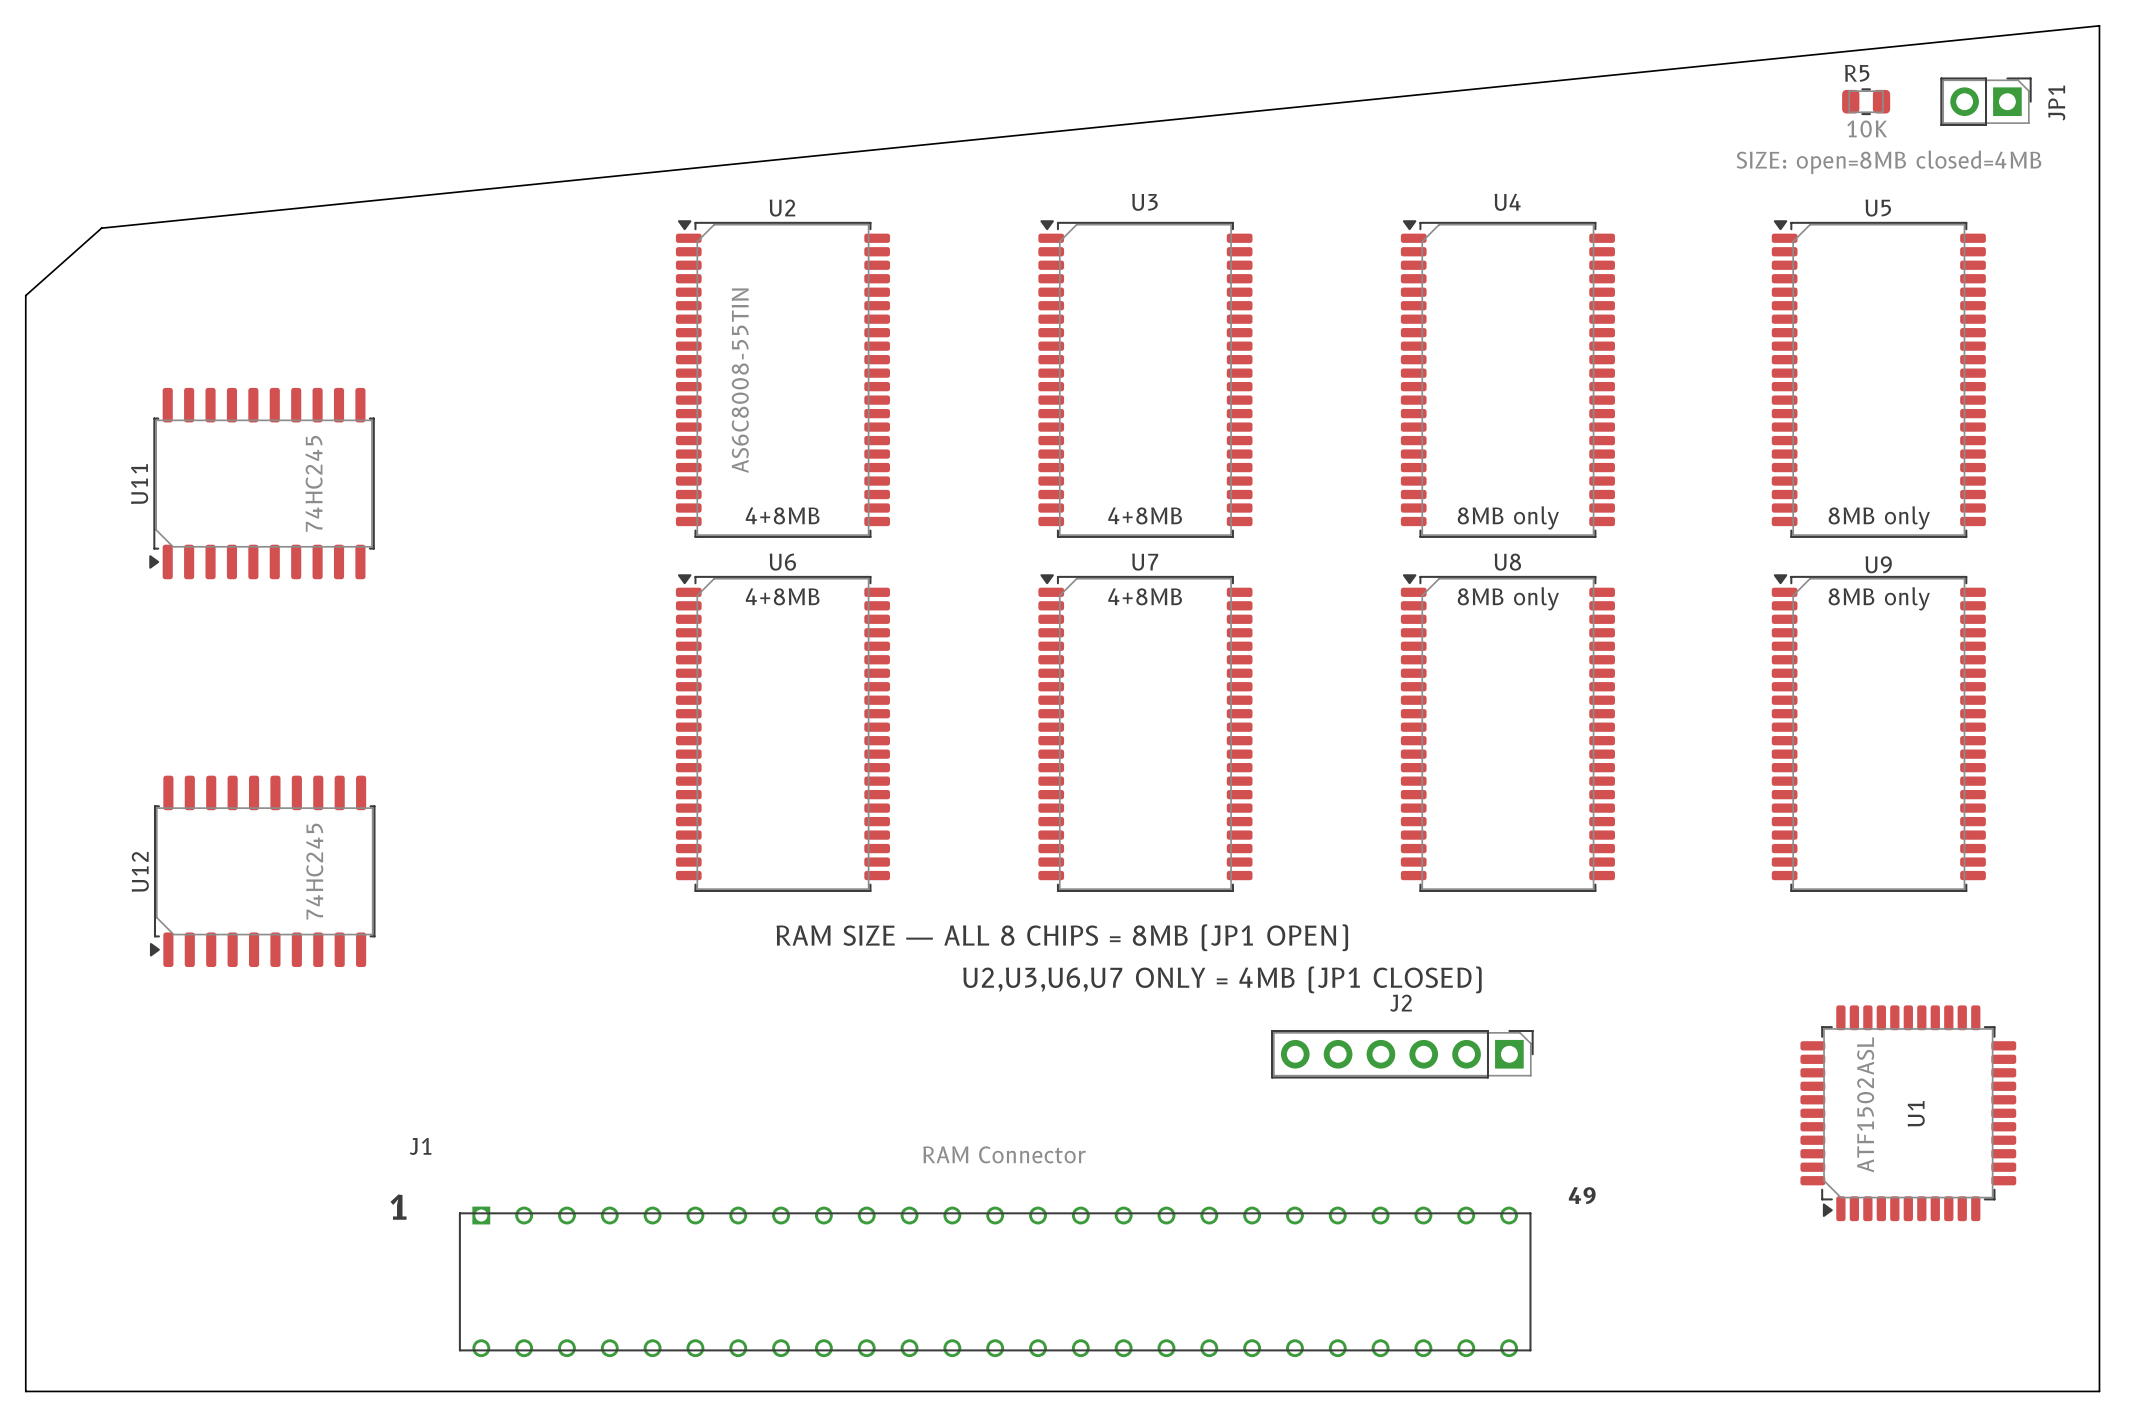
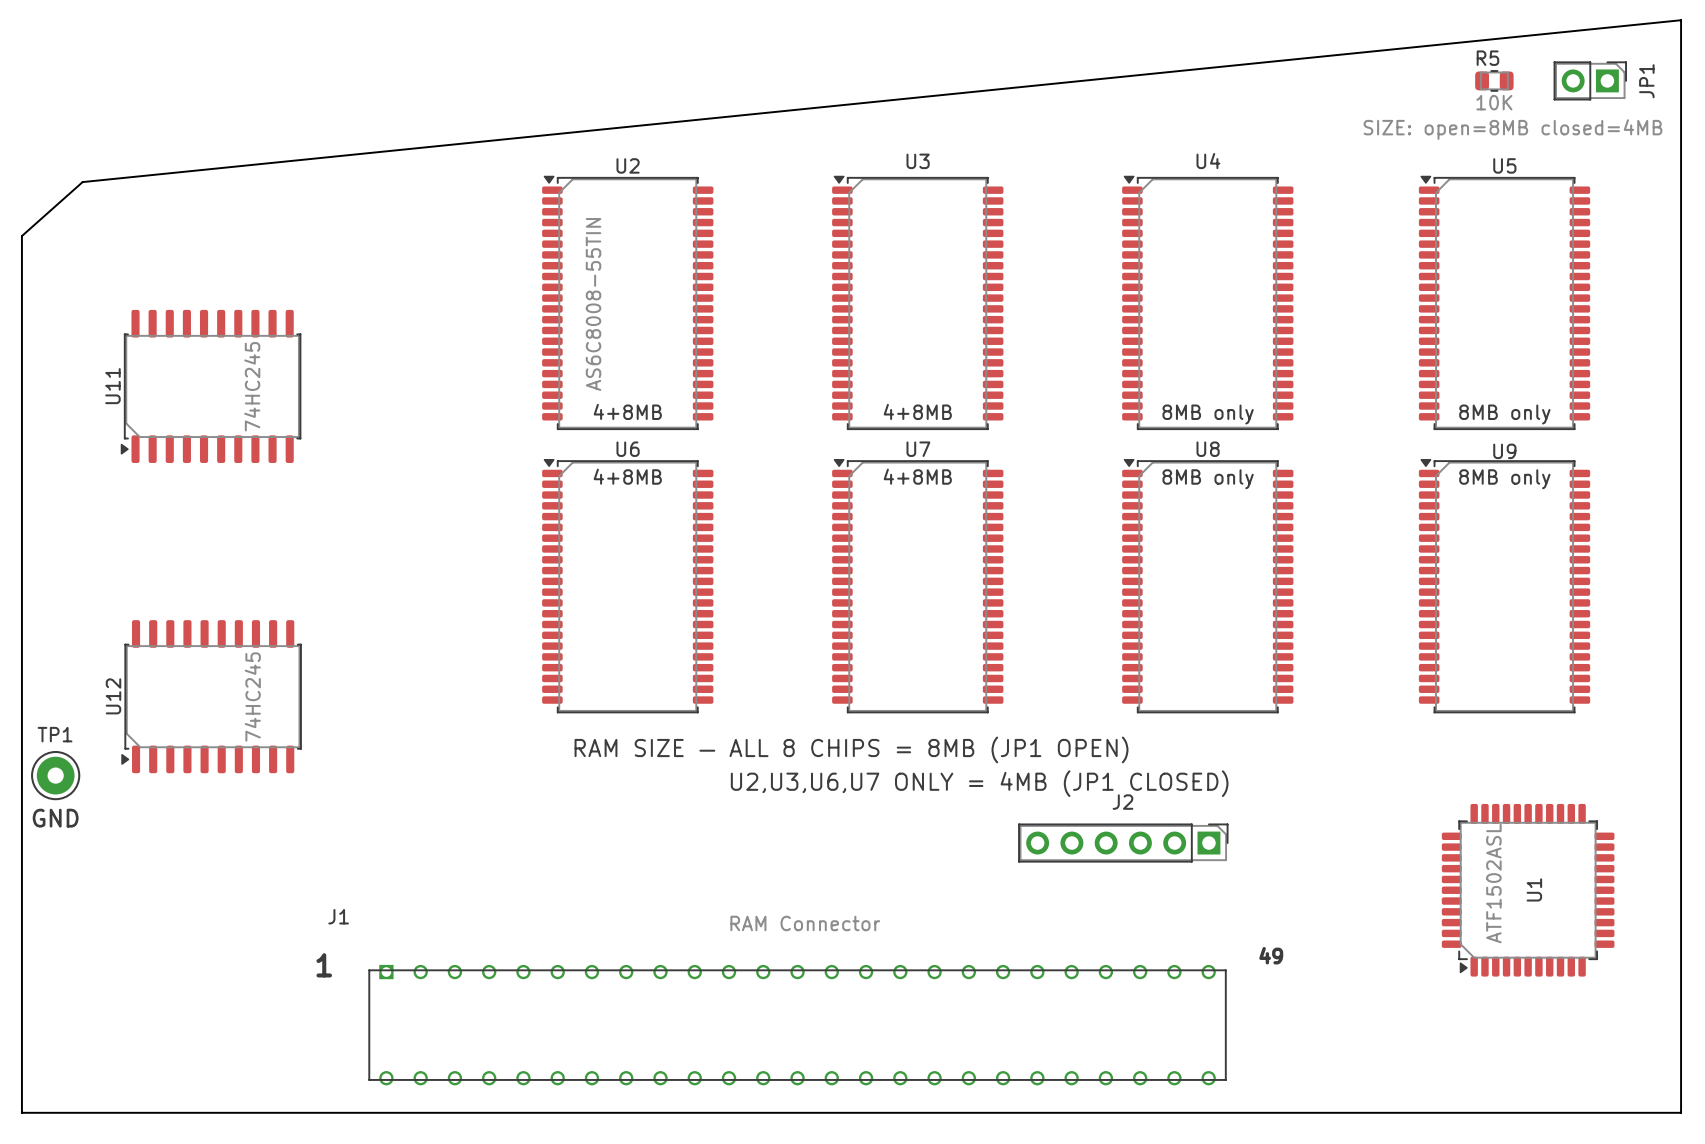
TP1: none -> GND (55, 775)

